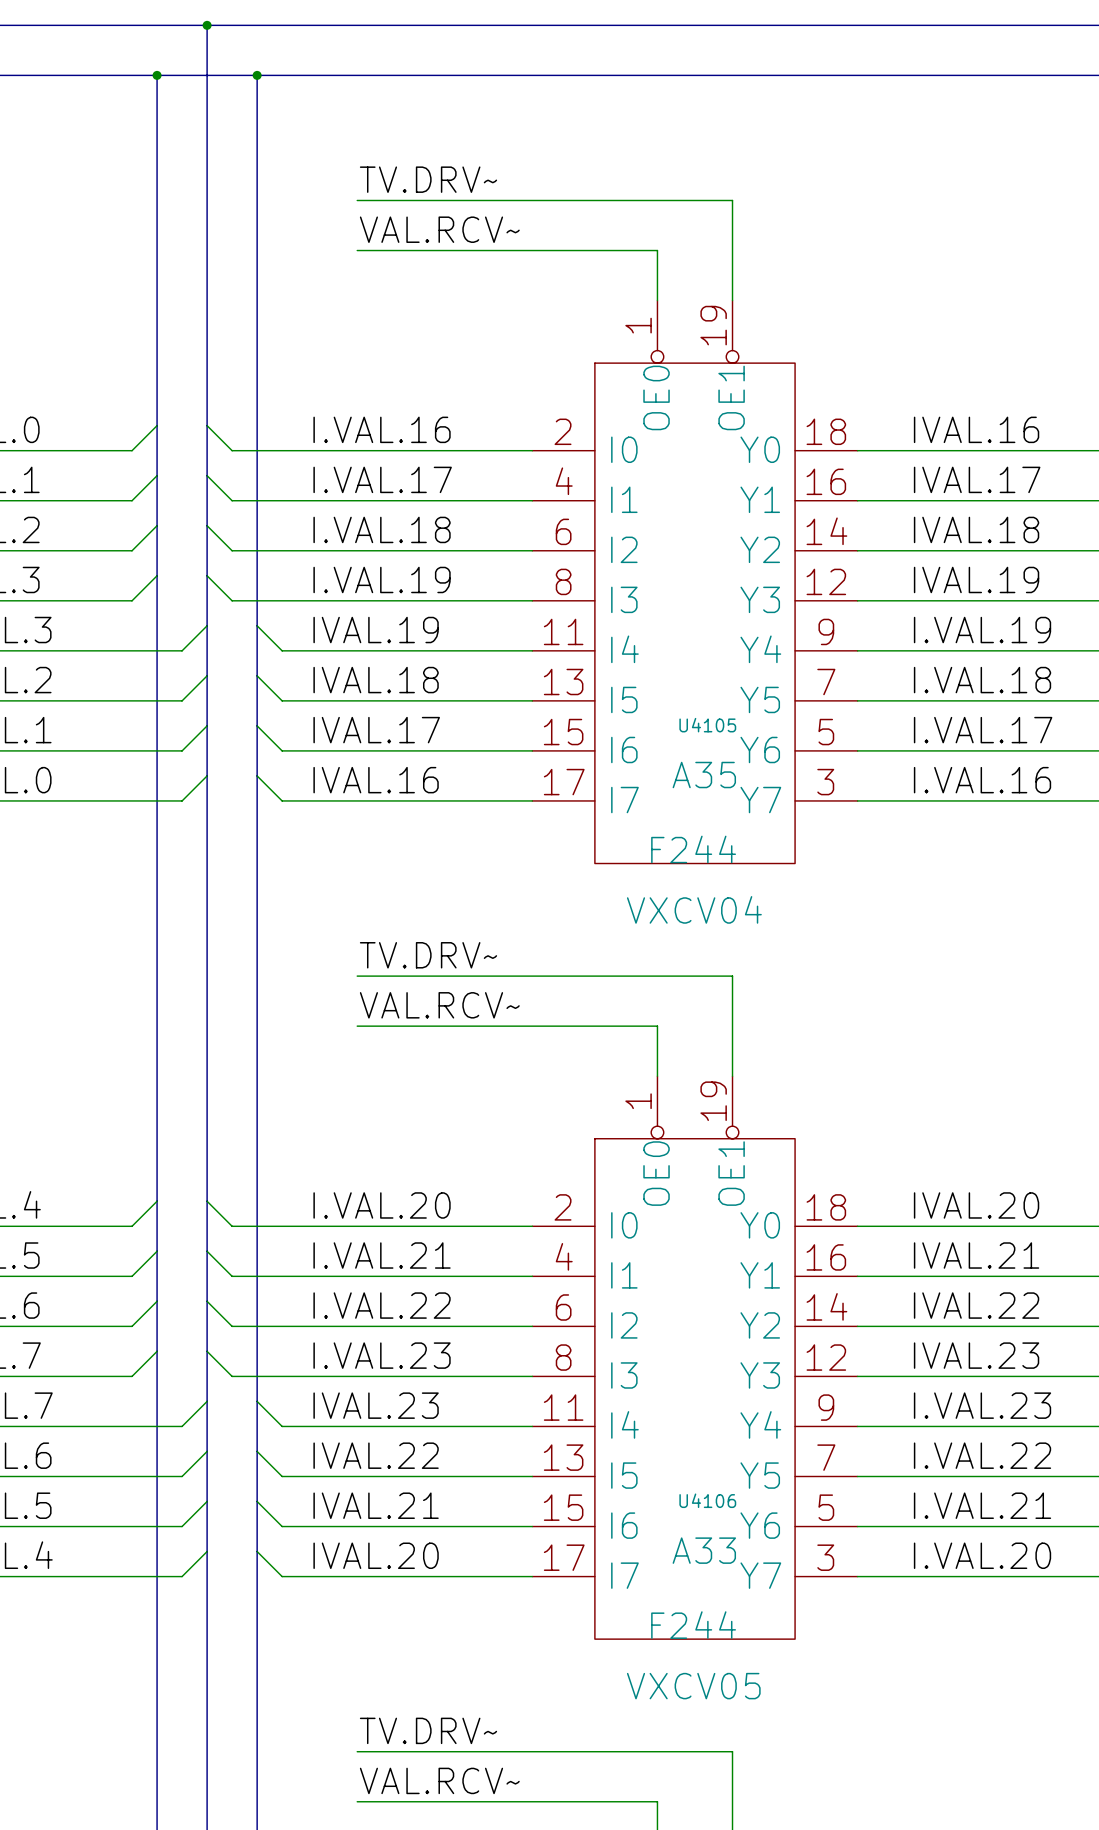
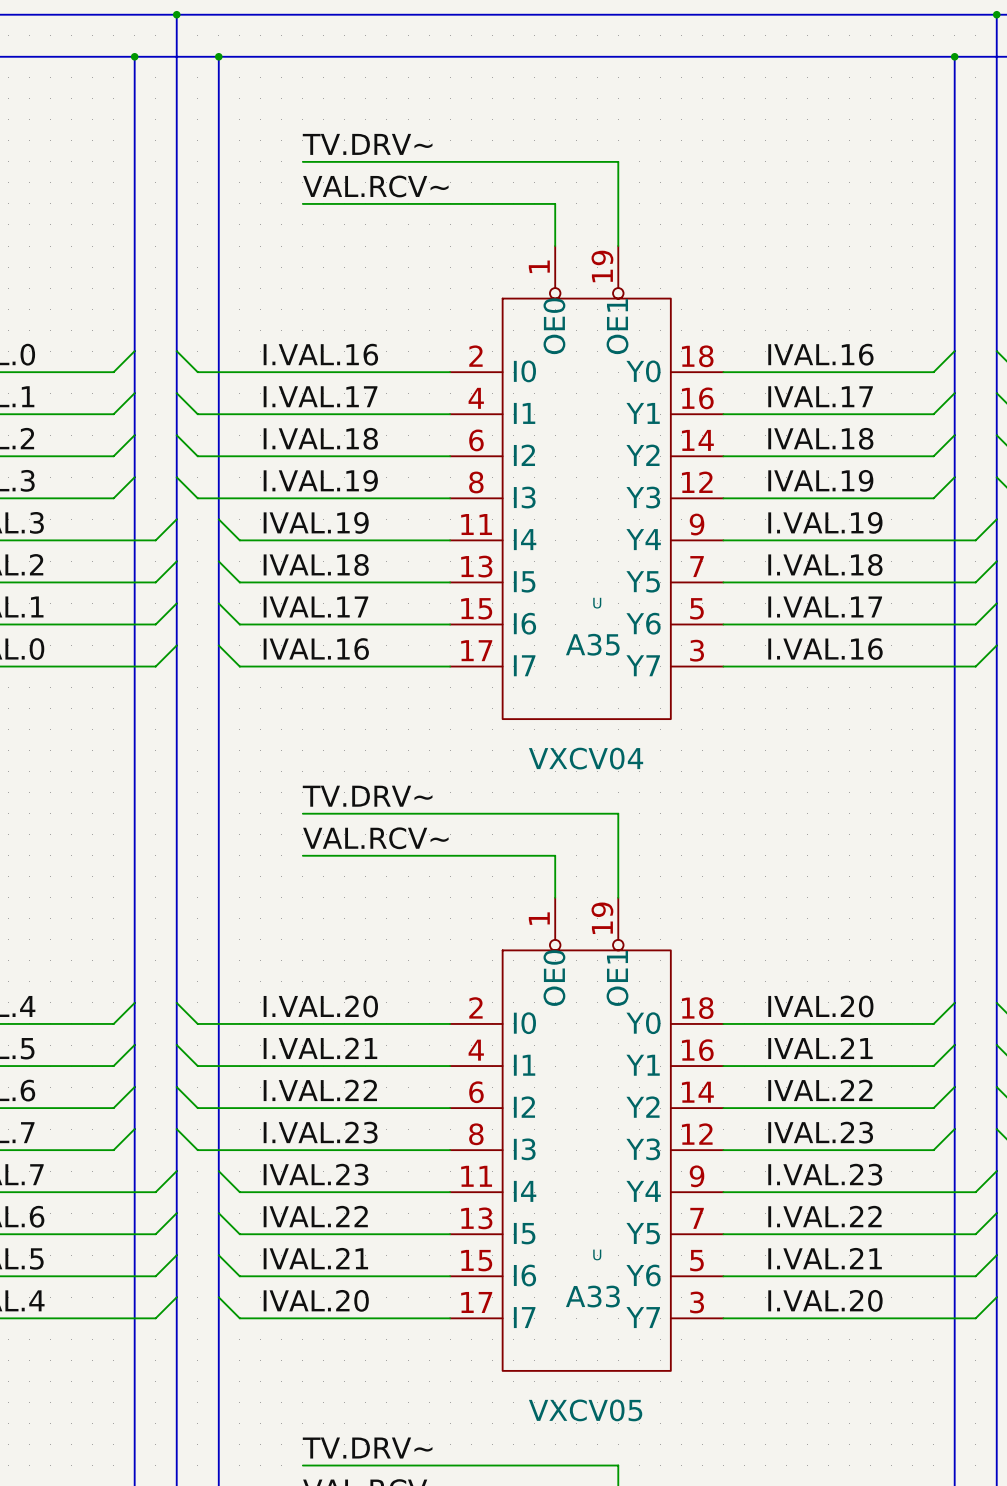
U4105 name: U4105 (707, 725) -> U (597, 603)
U4105 value: F244 (693, 849) -> none
U4106 name: U4106 (707, 1500) -> U (597, 1254)
U4106 value: F244 (693, 1625) -> none

